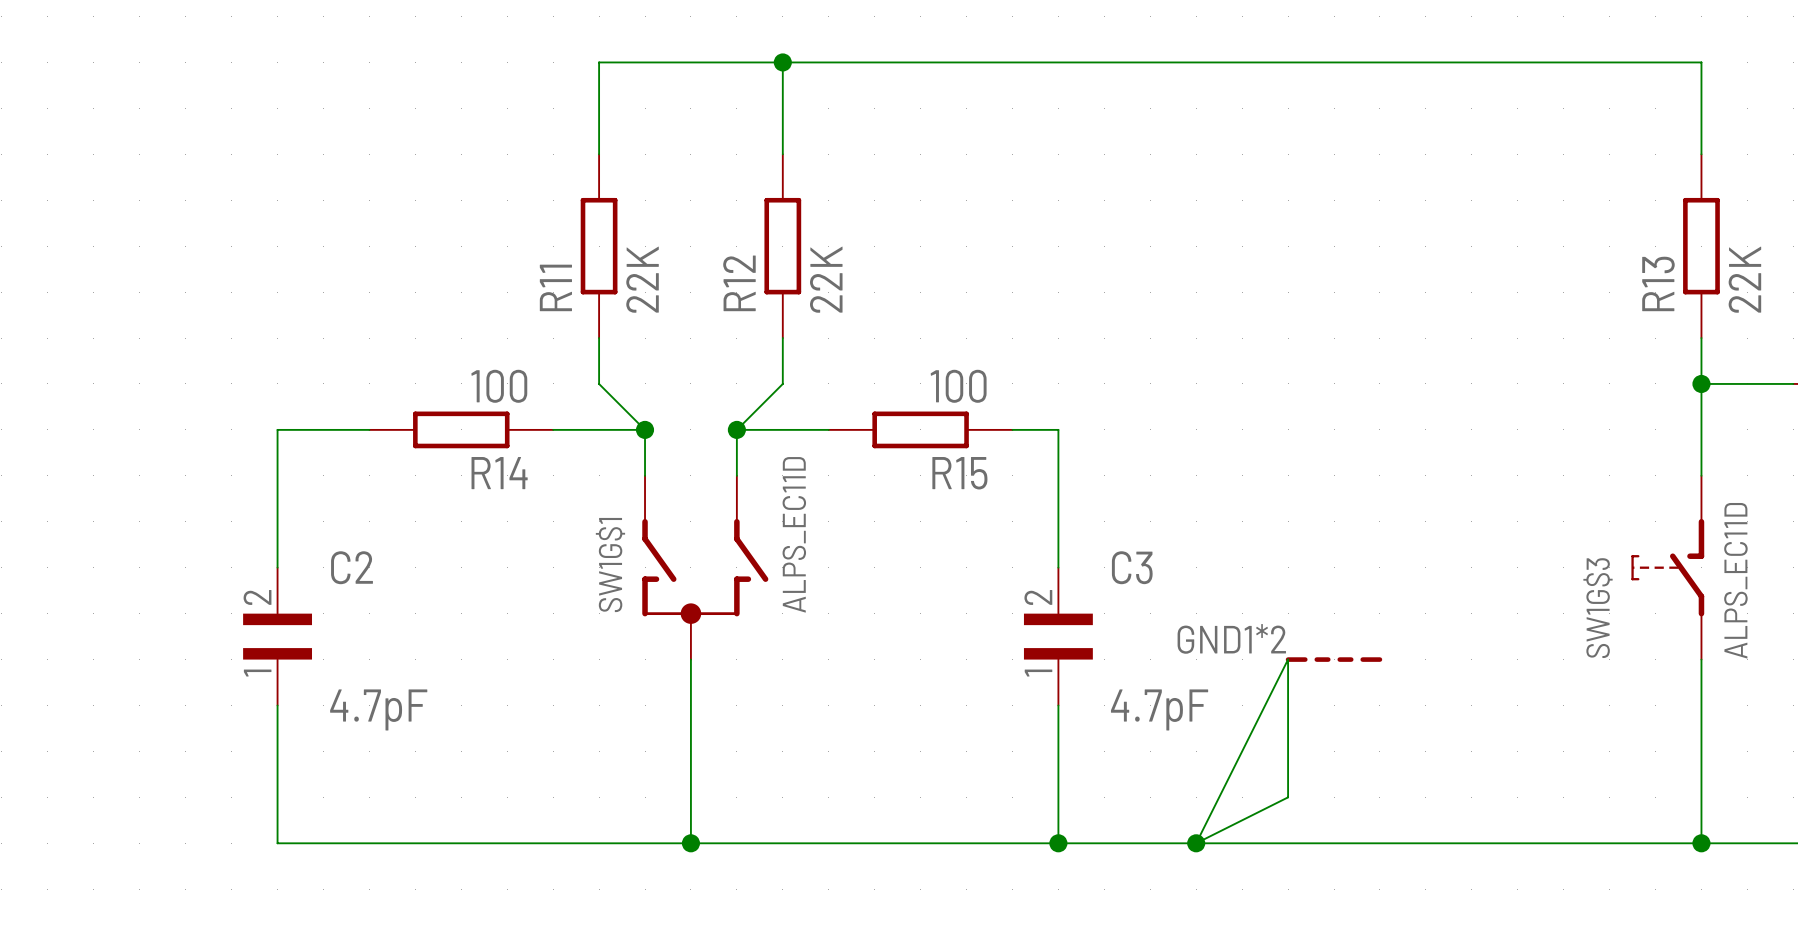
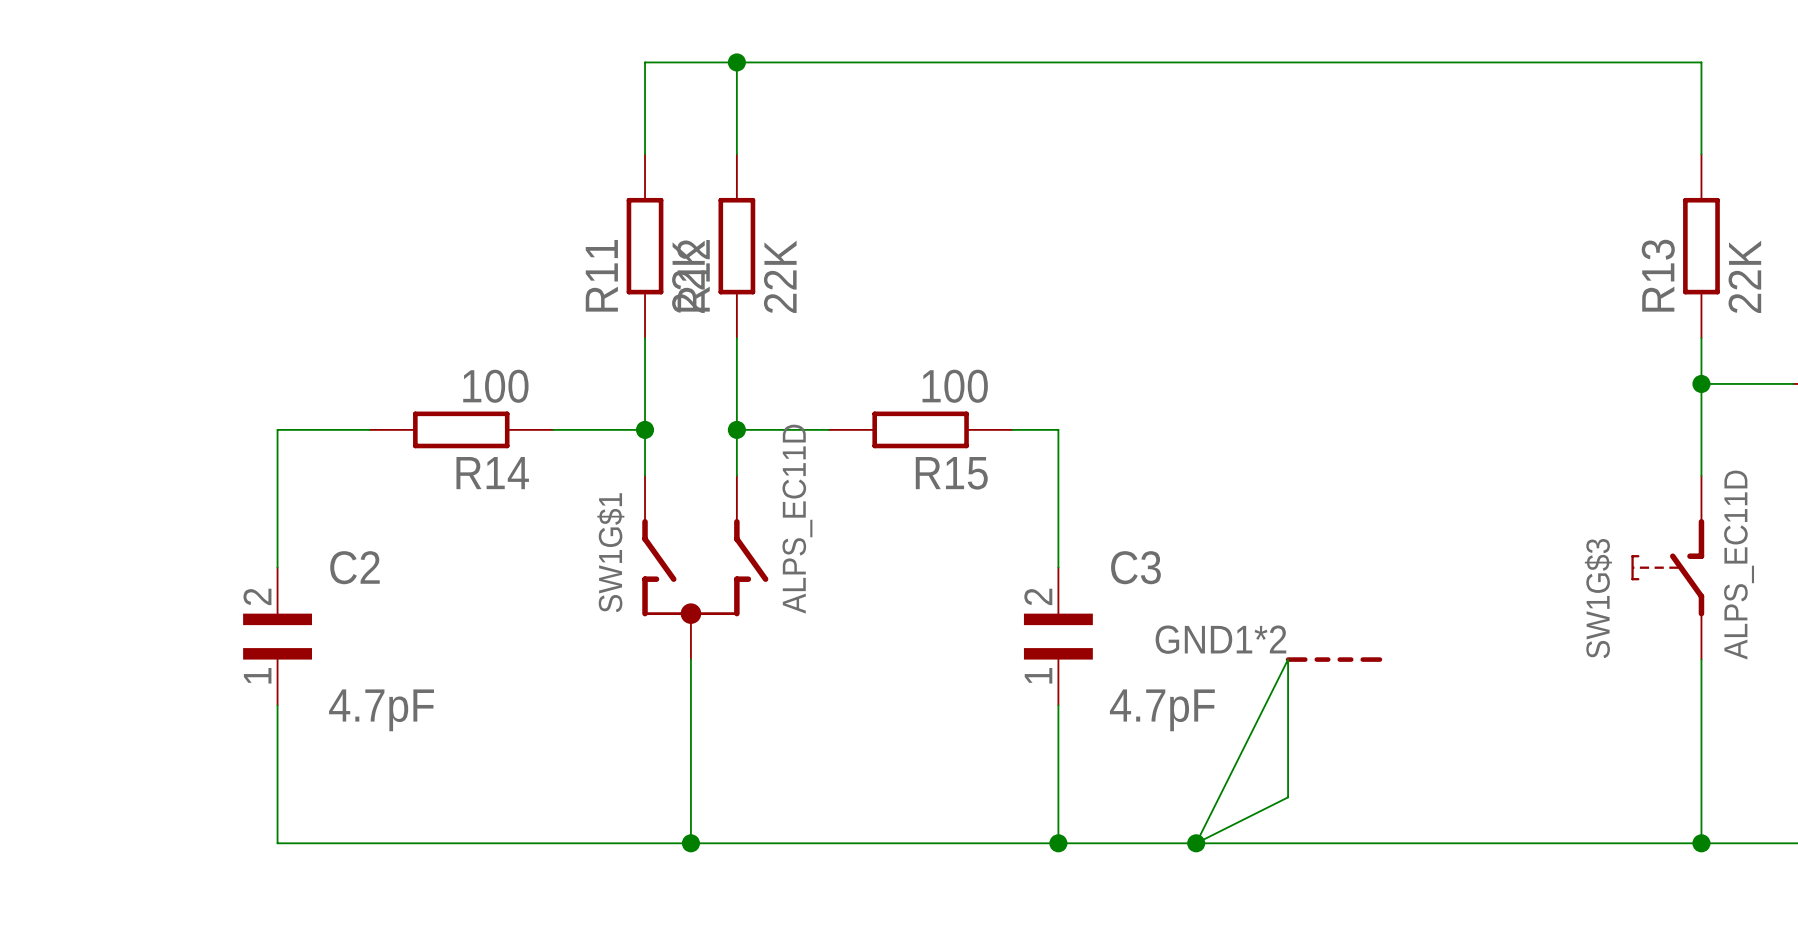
wire: (645, 62) (599, 62) (599, 154) -> (645, 62) (645, 154)
wire: (782, 62) (782, 154) -> (736, 62) (736, 154)
junction position: (782, 62) -> (736, 62)
R11 position: (599, 246) -> (645, 246)
R12 position: (782, 246) -> (736, 246)
wire: (599, 338) (599, 383) (645, 429) -> (645, 338) (645, 429)
wire: (782, 338) (782, 383) (736, 429) -> (736, 338) (736, 429)

